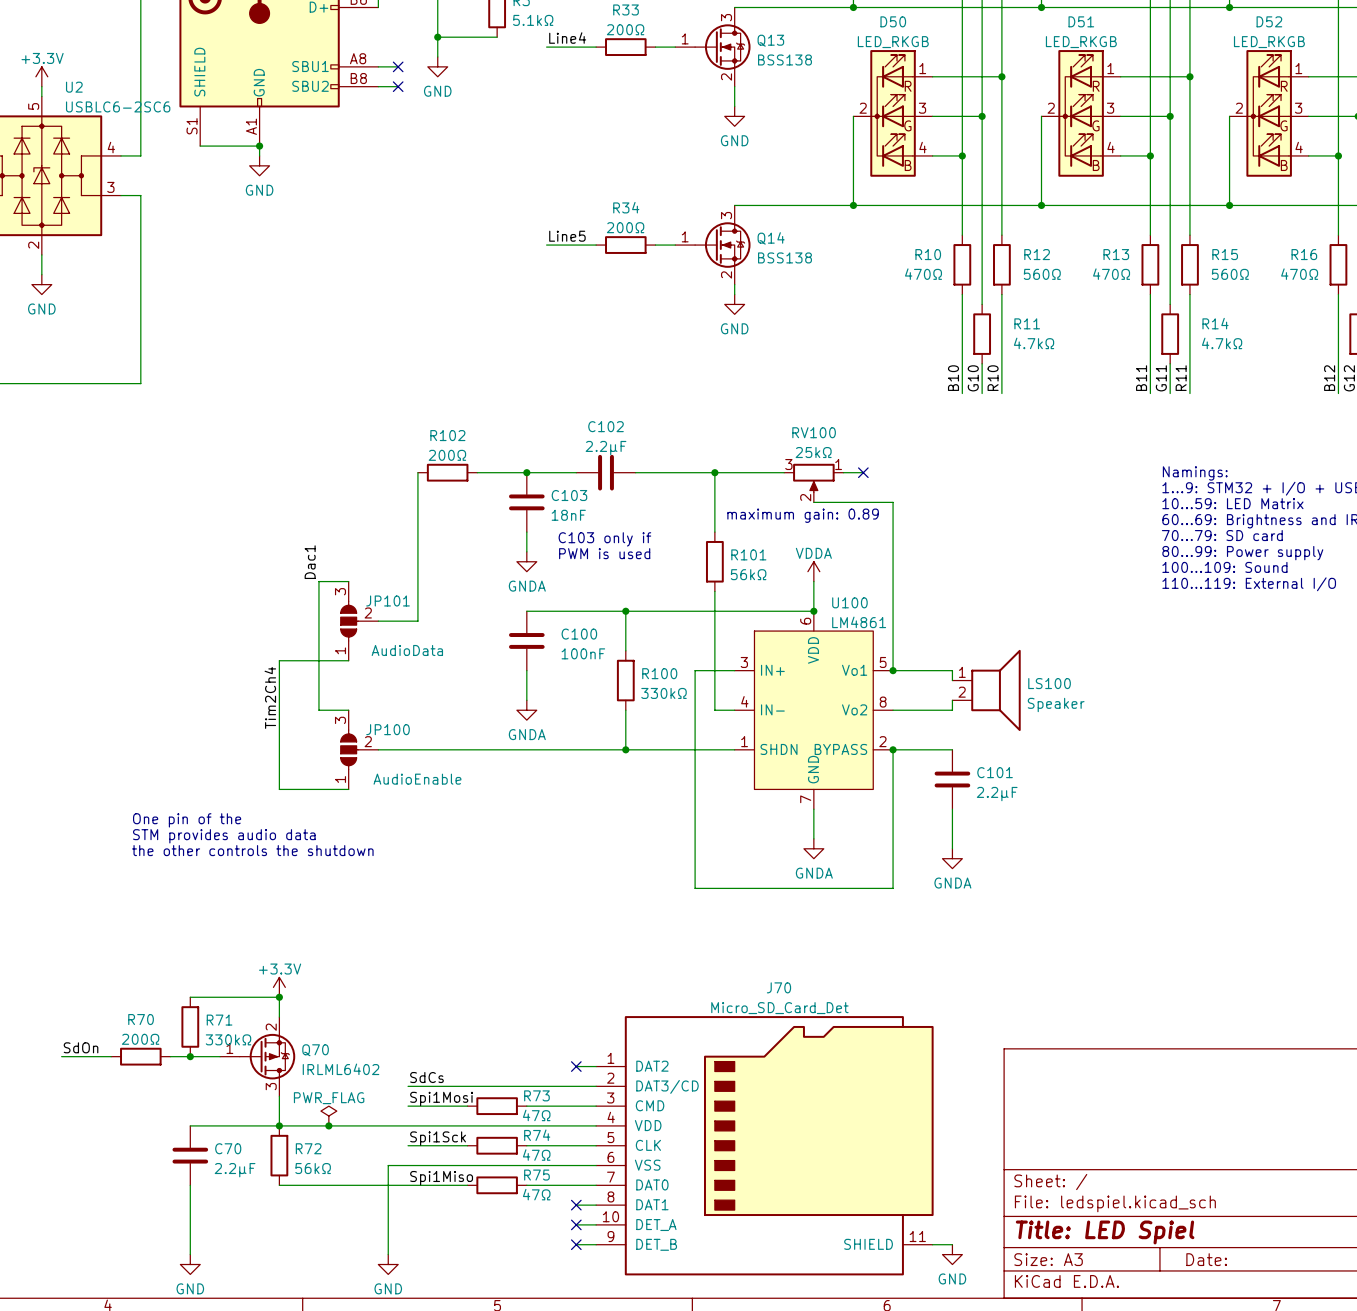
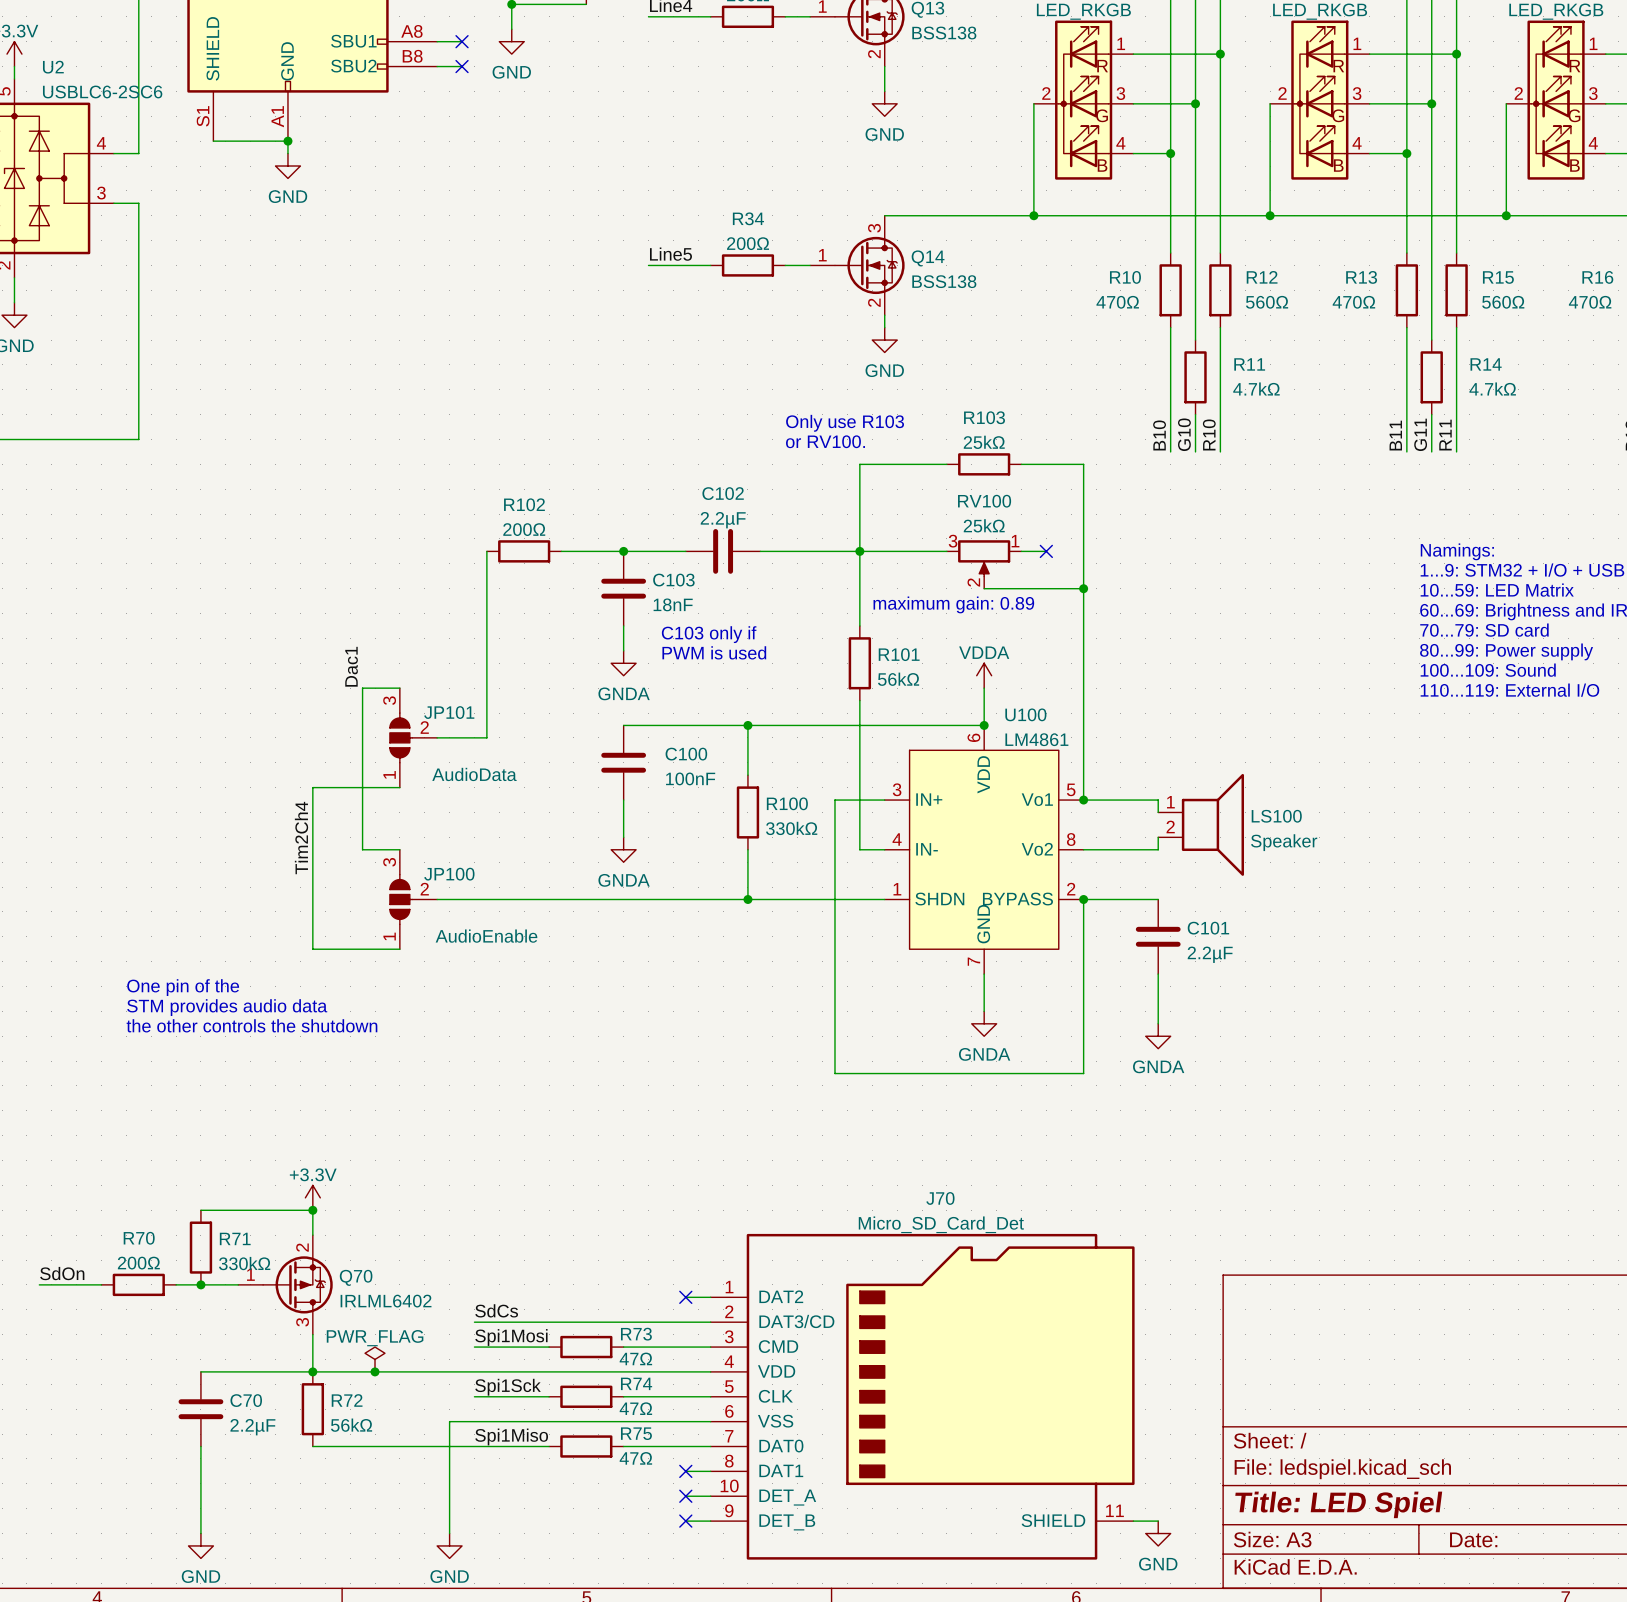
text: none -> Only use R103 (845, 423)
text: none -> or RV100. (825, 441)
wire: none -> (946, 464) (859, 464) (859, 551)
R103: none -> 25kΩ (984, 464)
wire: none -> (1021, 464) (1083, 464) (1083, 588)
junction: none -> (1083, 588)

